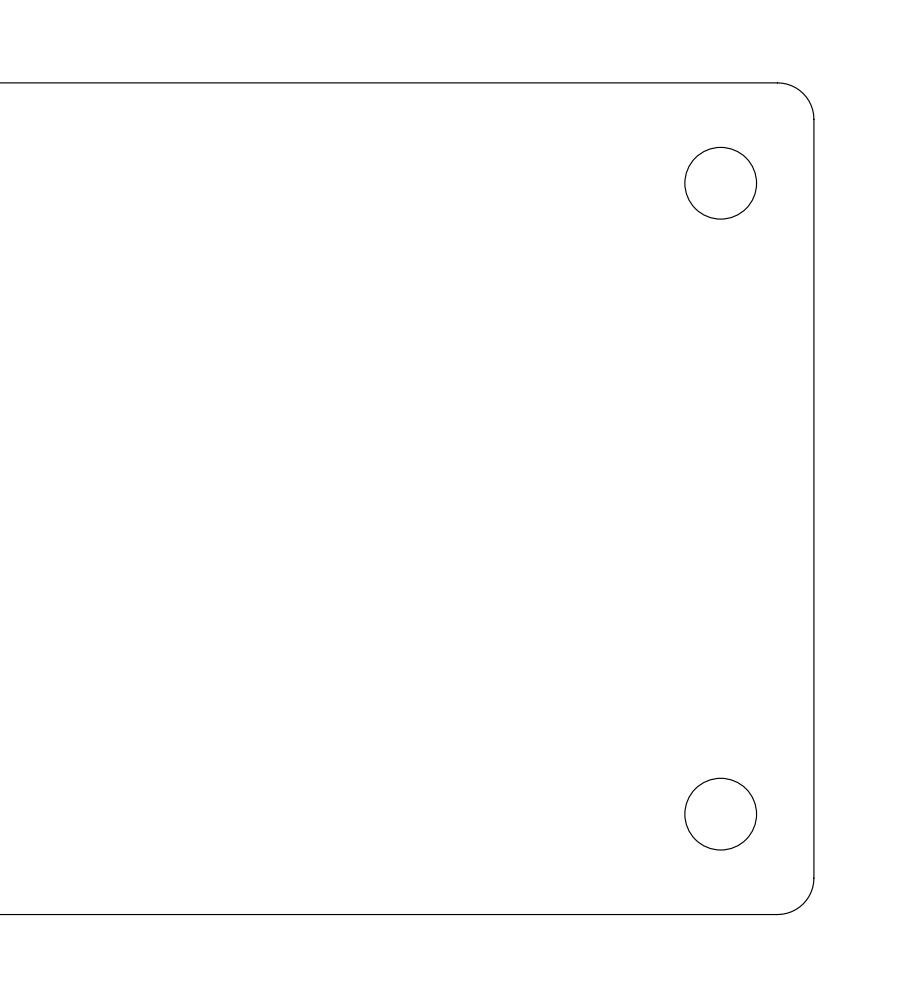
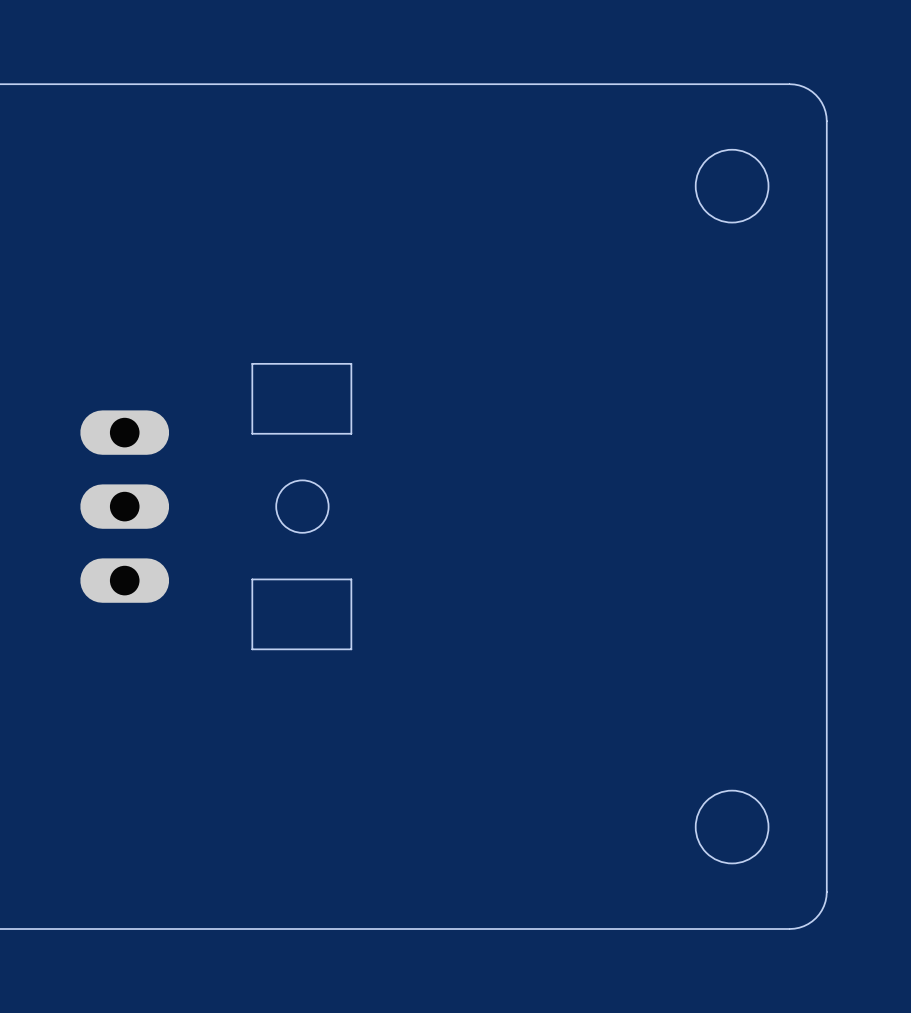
board edge: none -> (351, 363) (351, 433) (252, 433) (252, 363) (351, 363)
round board edge: none -> [276, 480, 329, 533]
part: none -> (124, 506)
board edge: none -> (351, 579) (351, 649) (252, 649) (252, 579) (351, 579)

